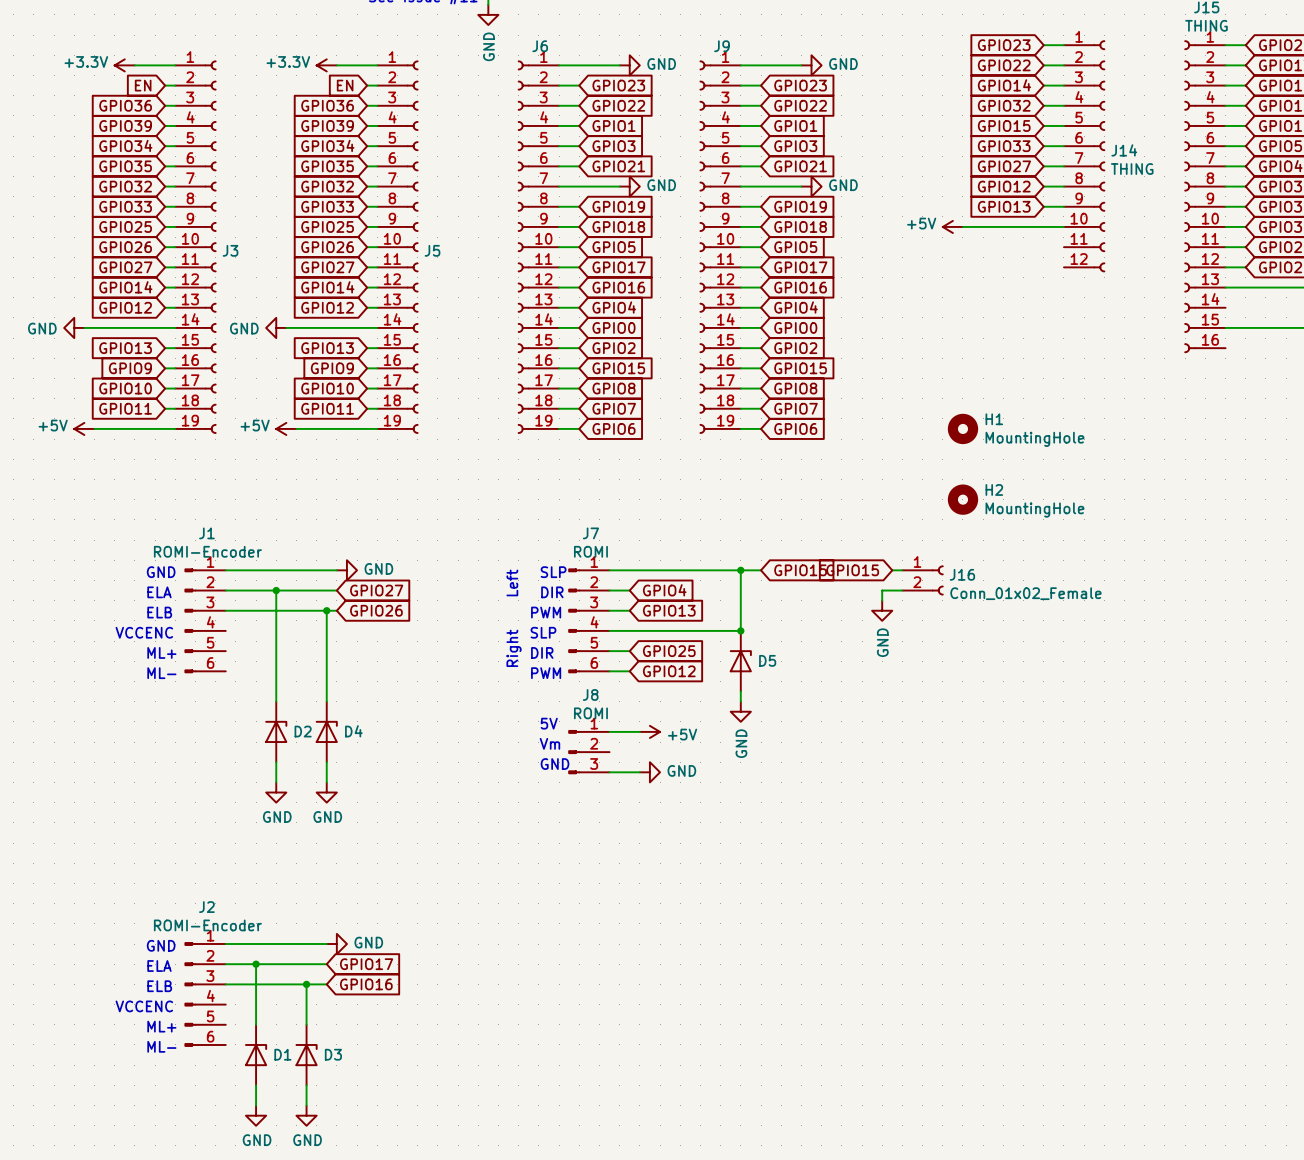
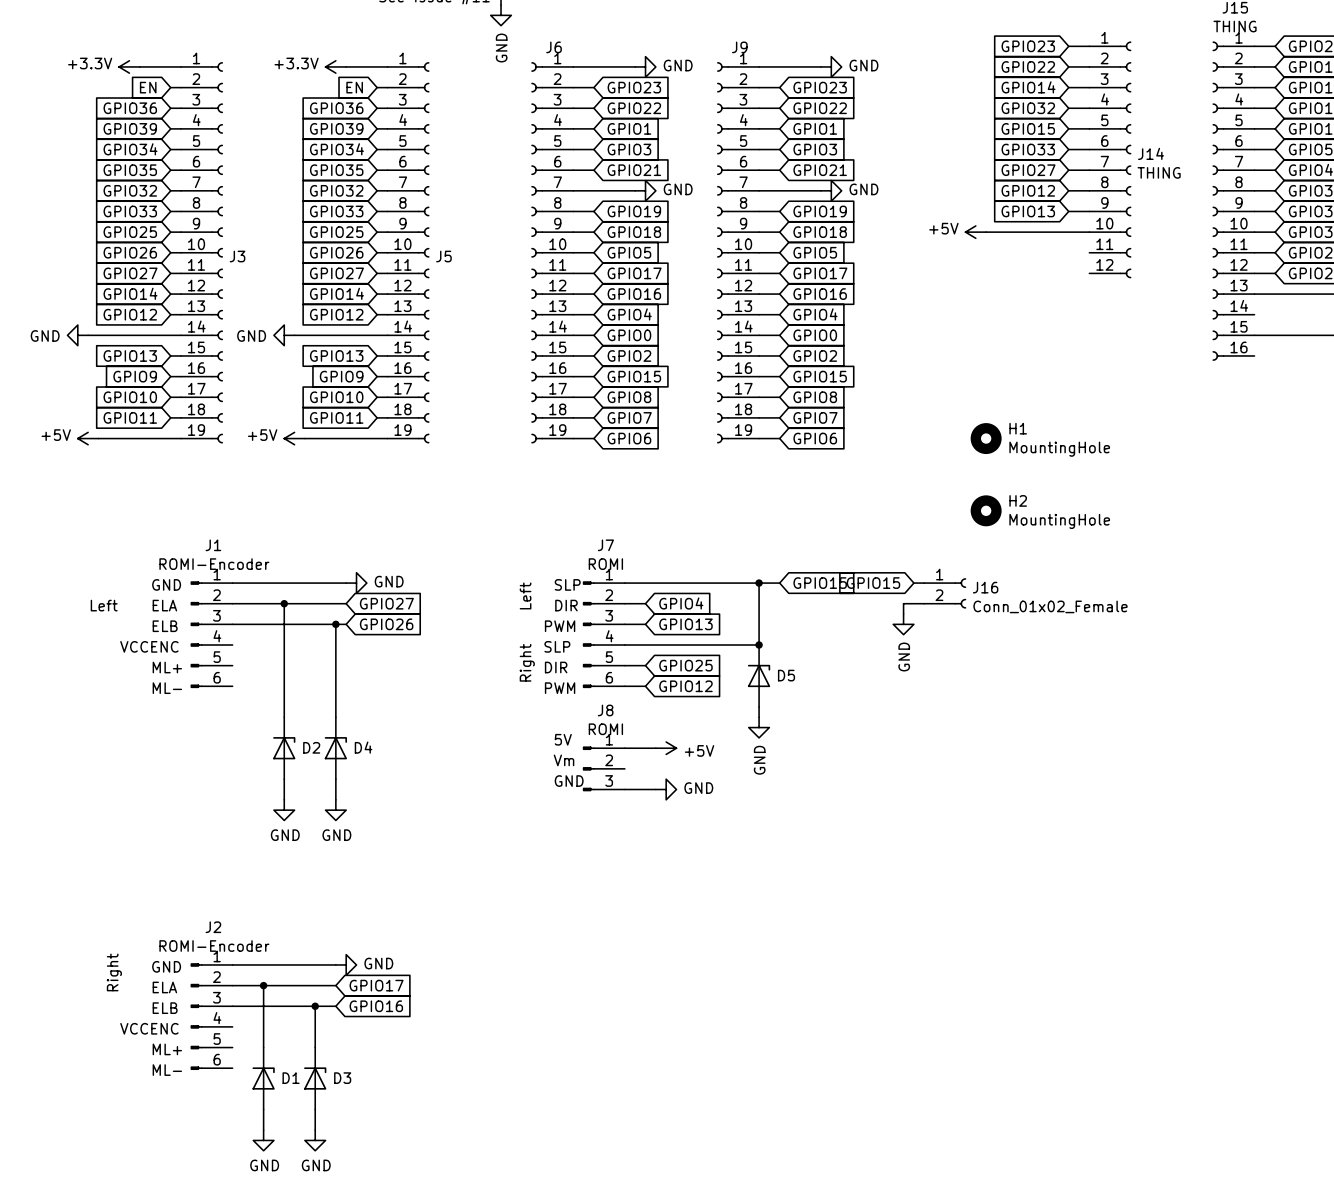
text: none -> Left (104, 605)
text: none -> Right (114, 972)

